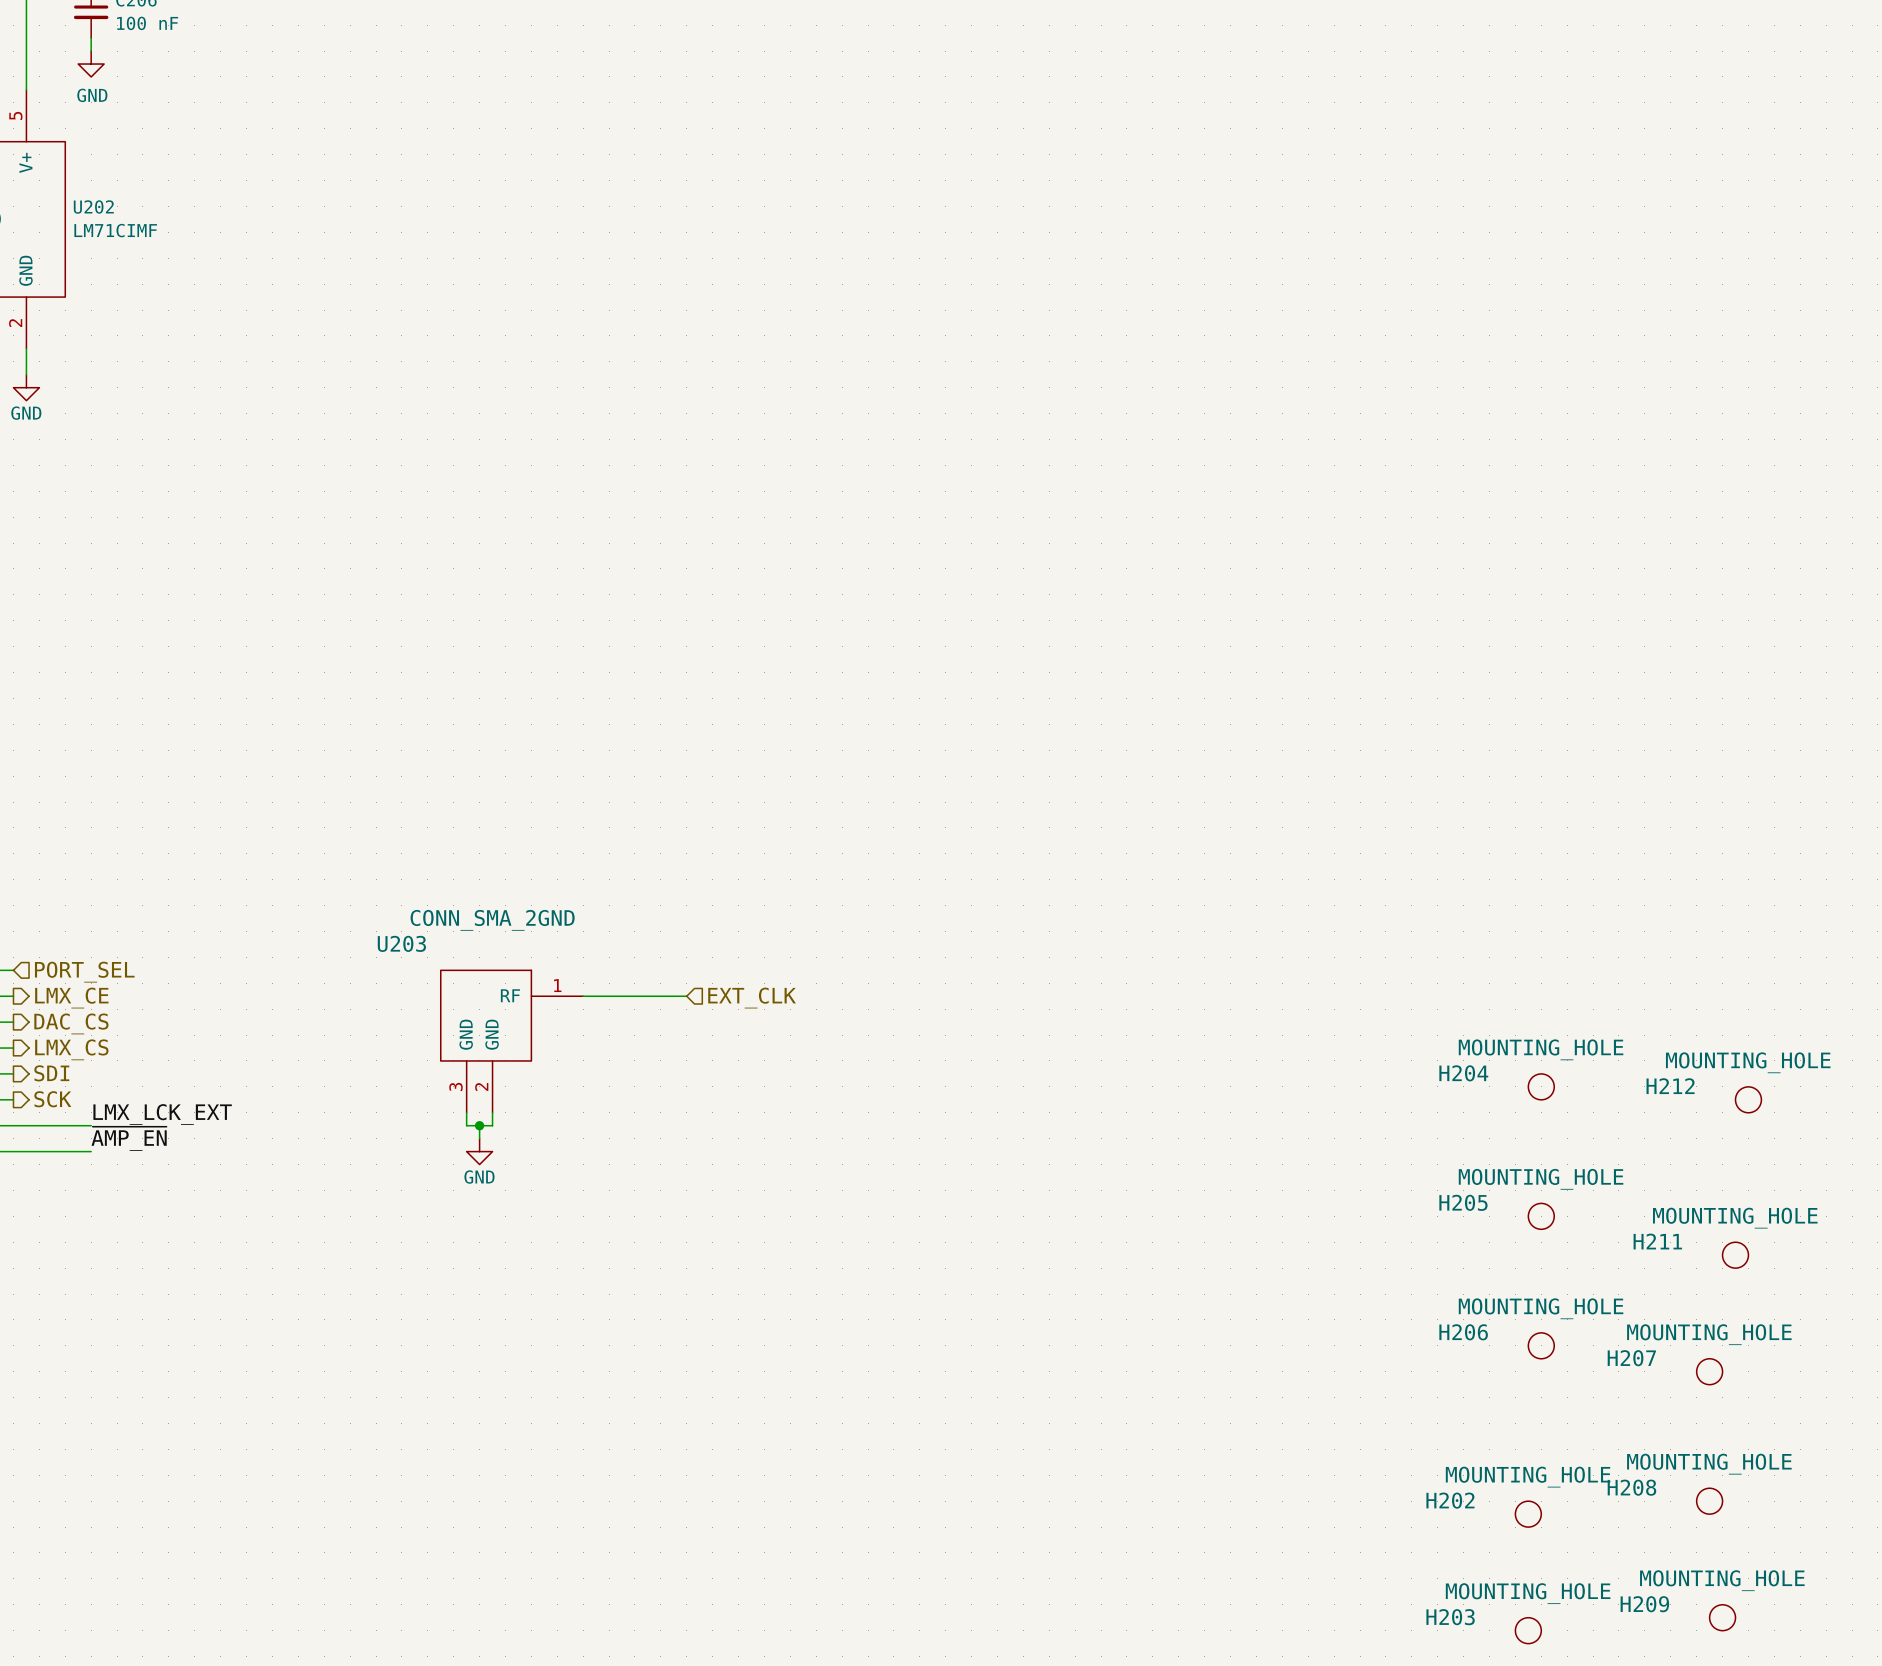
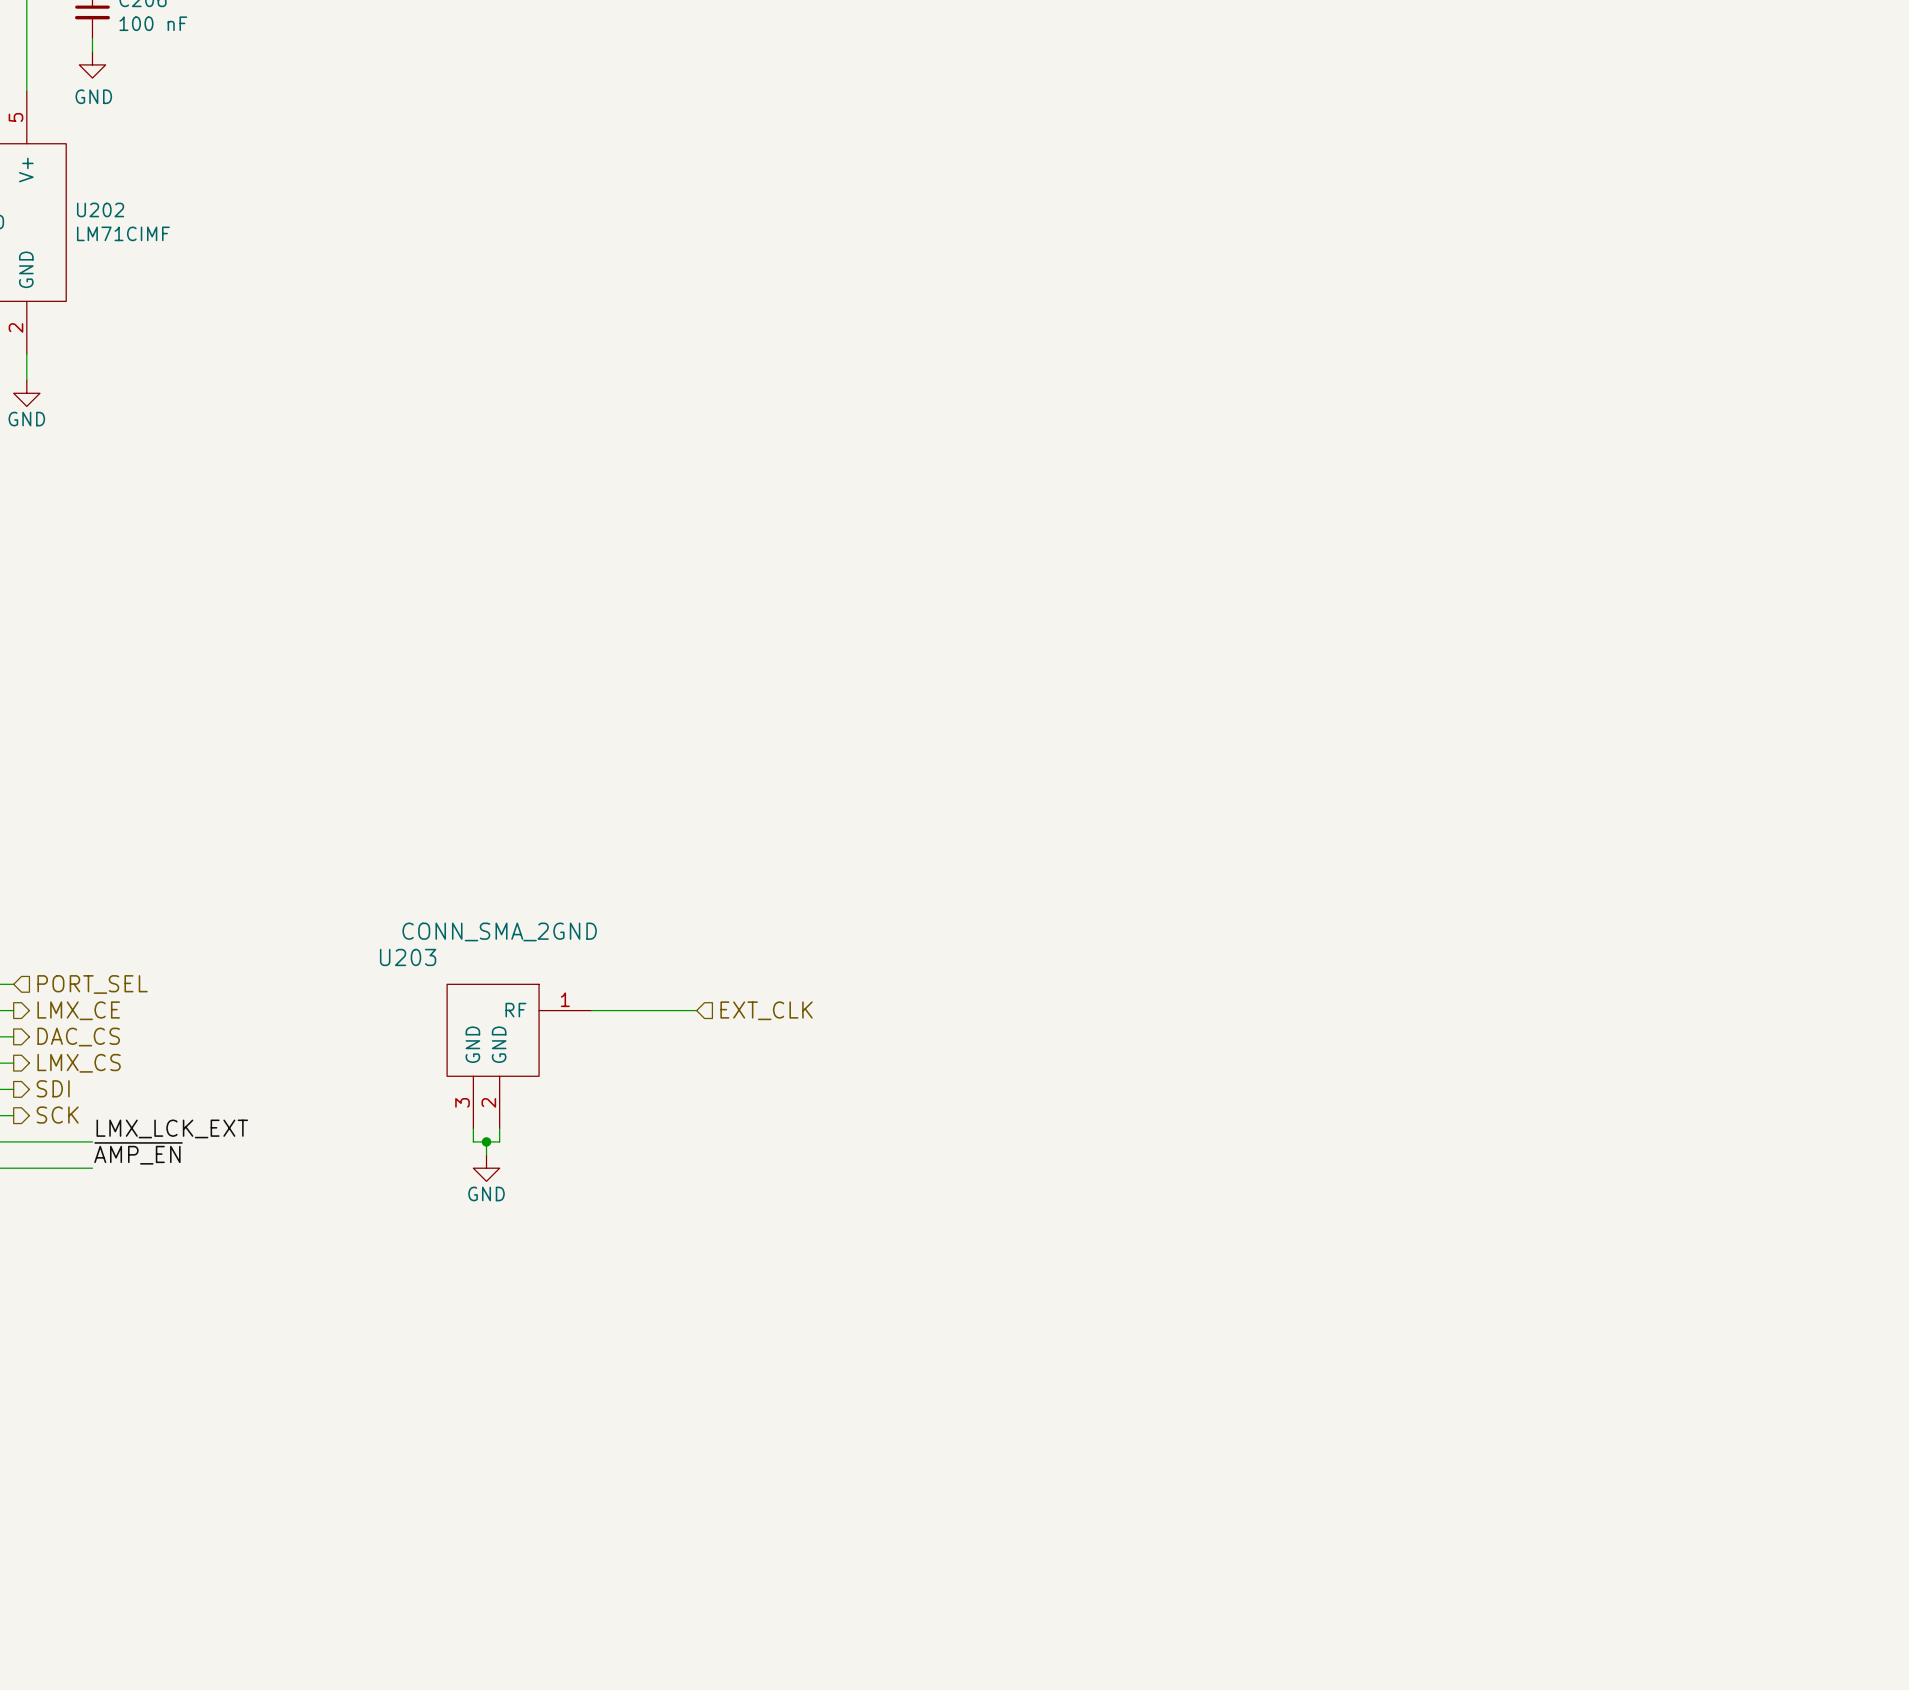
H204: MOUNTING_HOLE (1541, 1086) -> none
H212: MOUNTING_HOLE (1748, 1099) -> none
H205: MOUNTING_HOLE (1541, 1216) -> none
H211: MOUNTING_HOLE (1735, 1255) -> none
H206: MOUNTING_HOLE (1541, 1345) -> none
H207: MOUNTING_HOLE (1709, 1371) -> none
H208: MOUNTING_HOLE (1709, 1501) -> none
H202: MOUNTING_HOLE (1528, 1514) -> none
H209: MOUNTING_HOLE (1722, 1617) -> none
H203: MOUNTING_HOLE (1528, 1630) -> none

